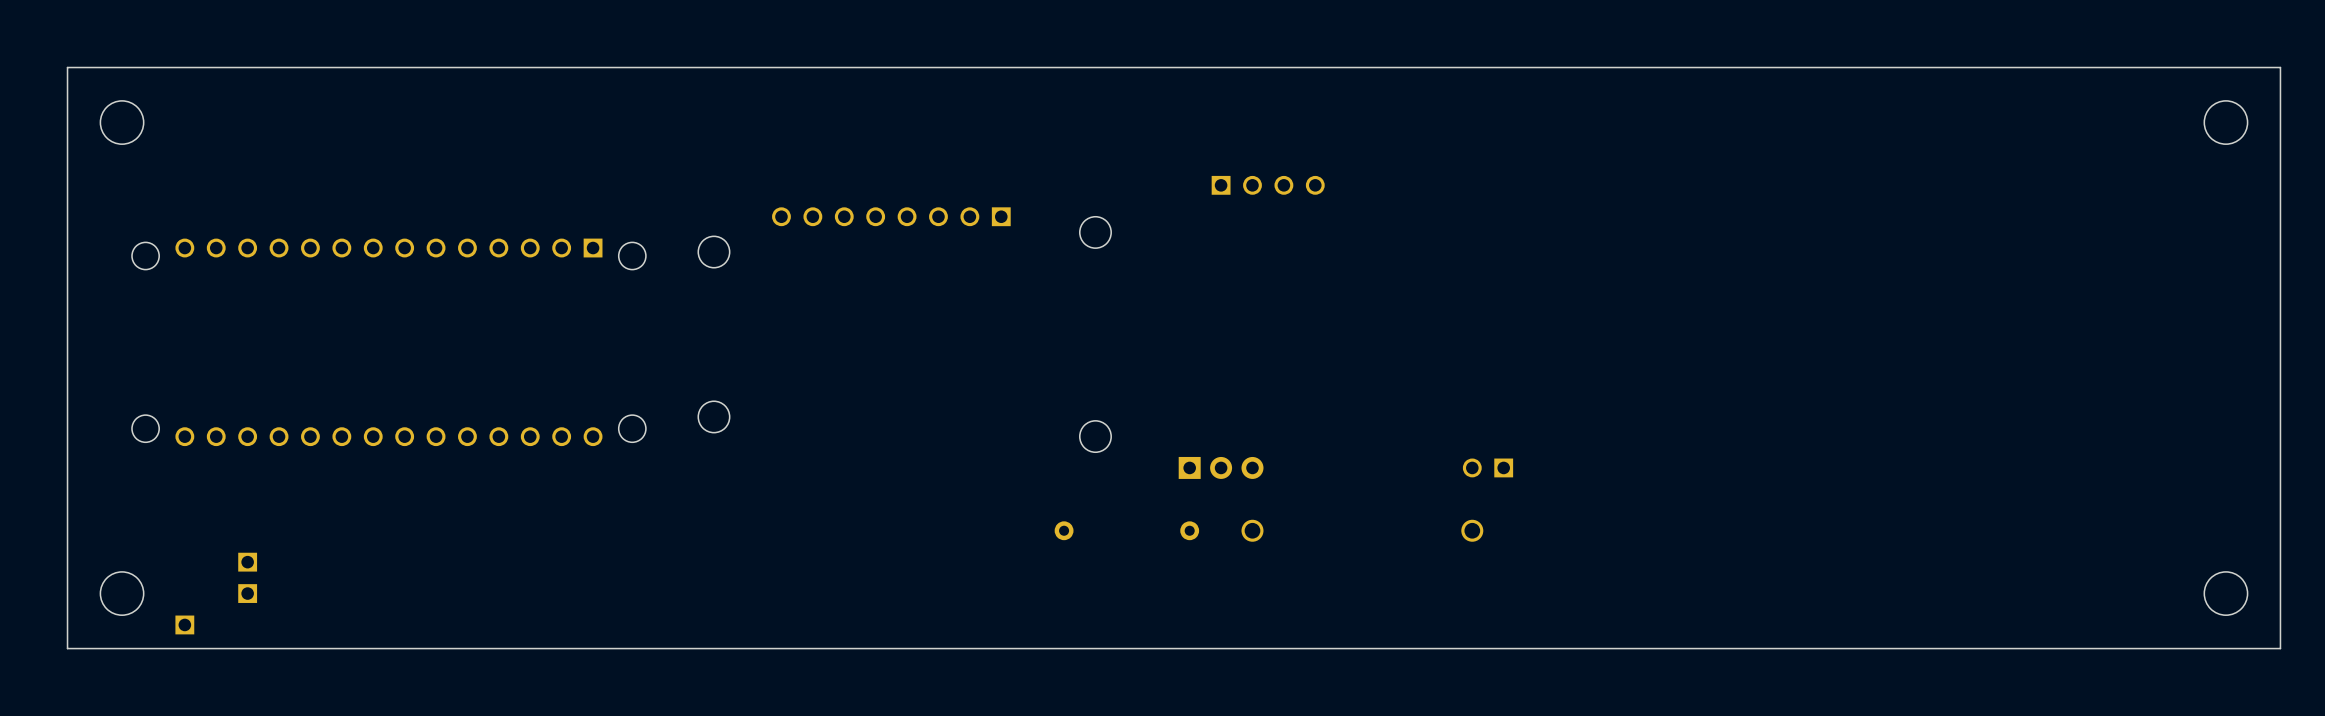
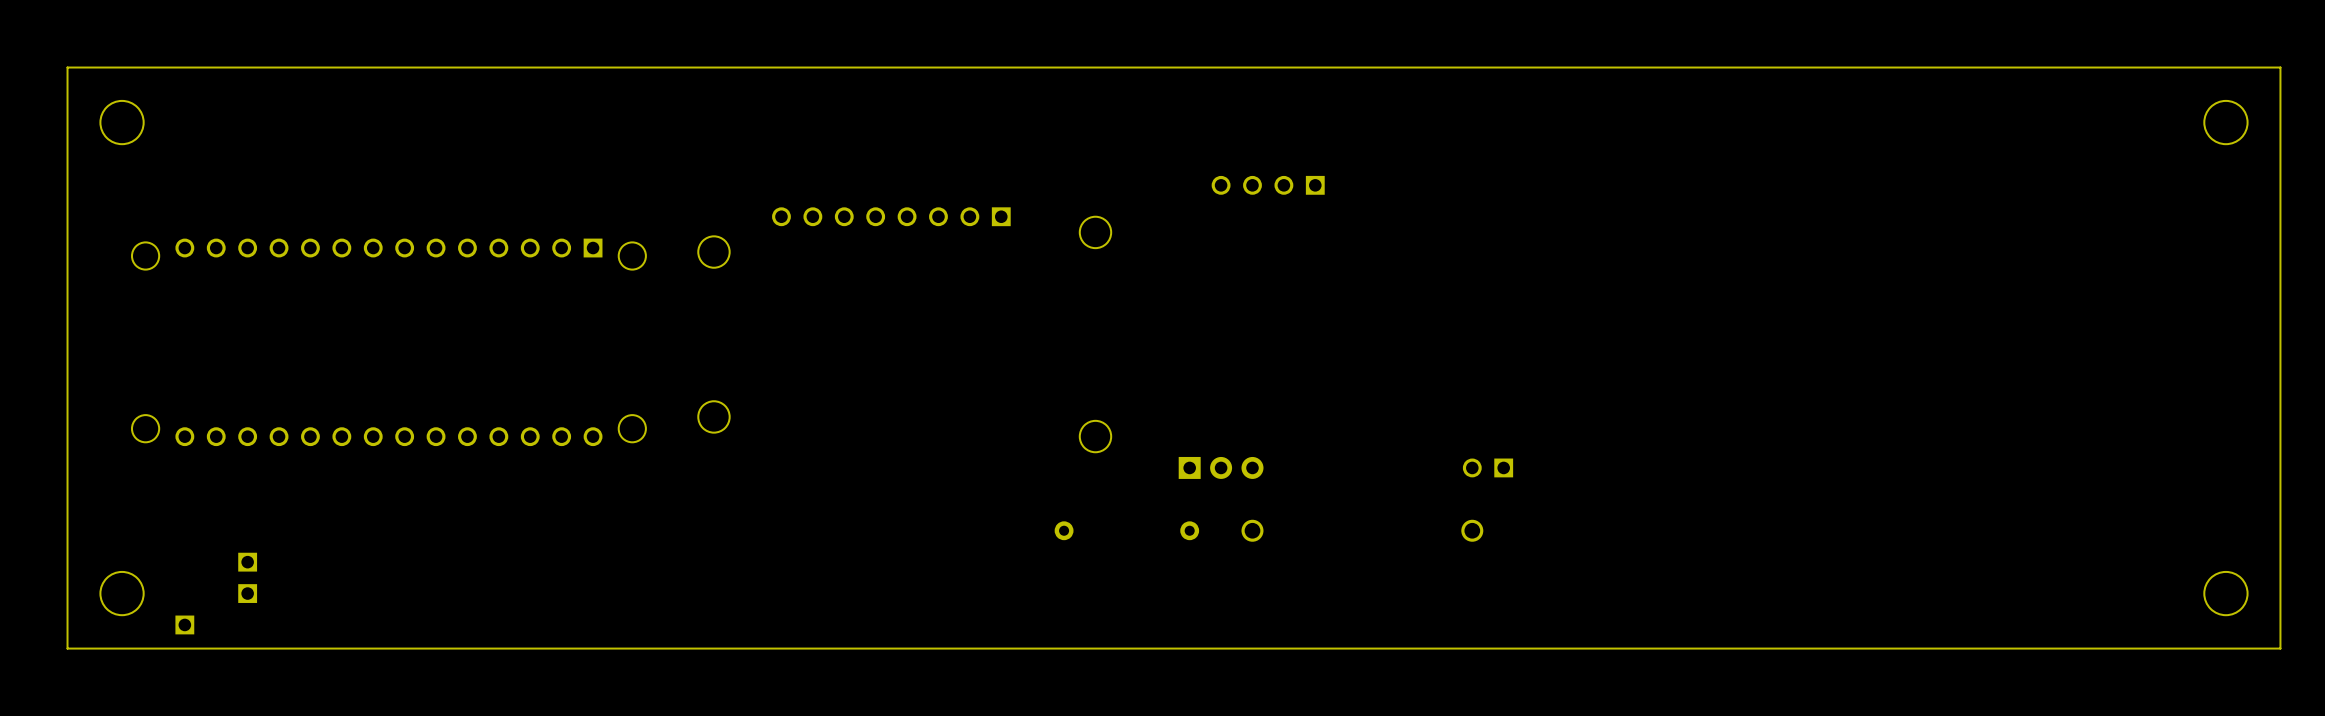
part rotation: 0° (1268, 185) -> 180° (1268, 185)

